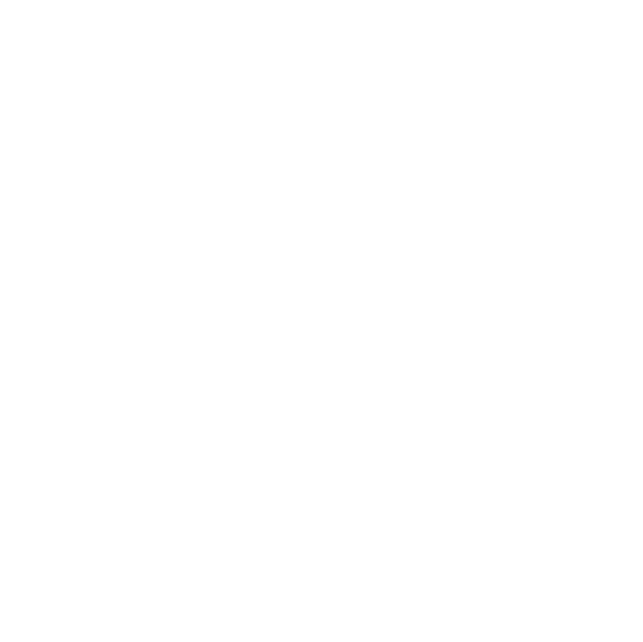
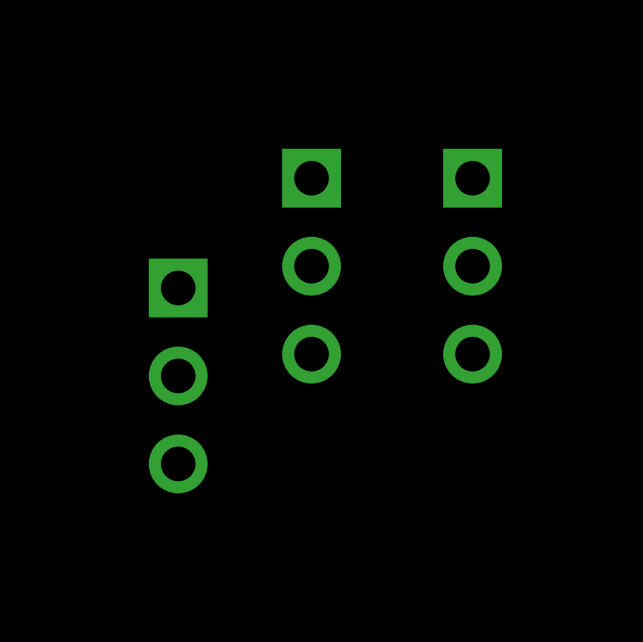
part: none -> (311, 266)
part: none -> (472, 266)
part: none -> (178, 375)

